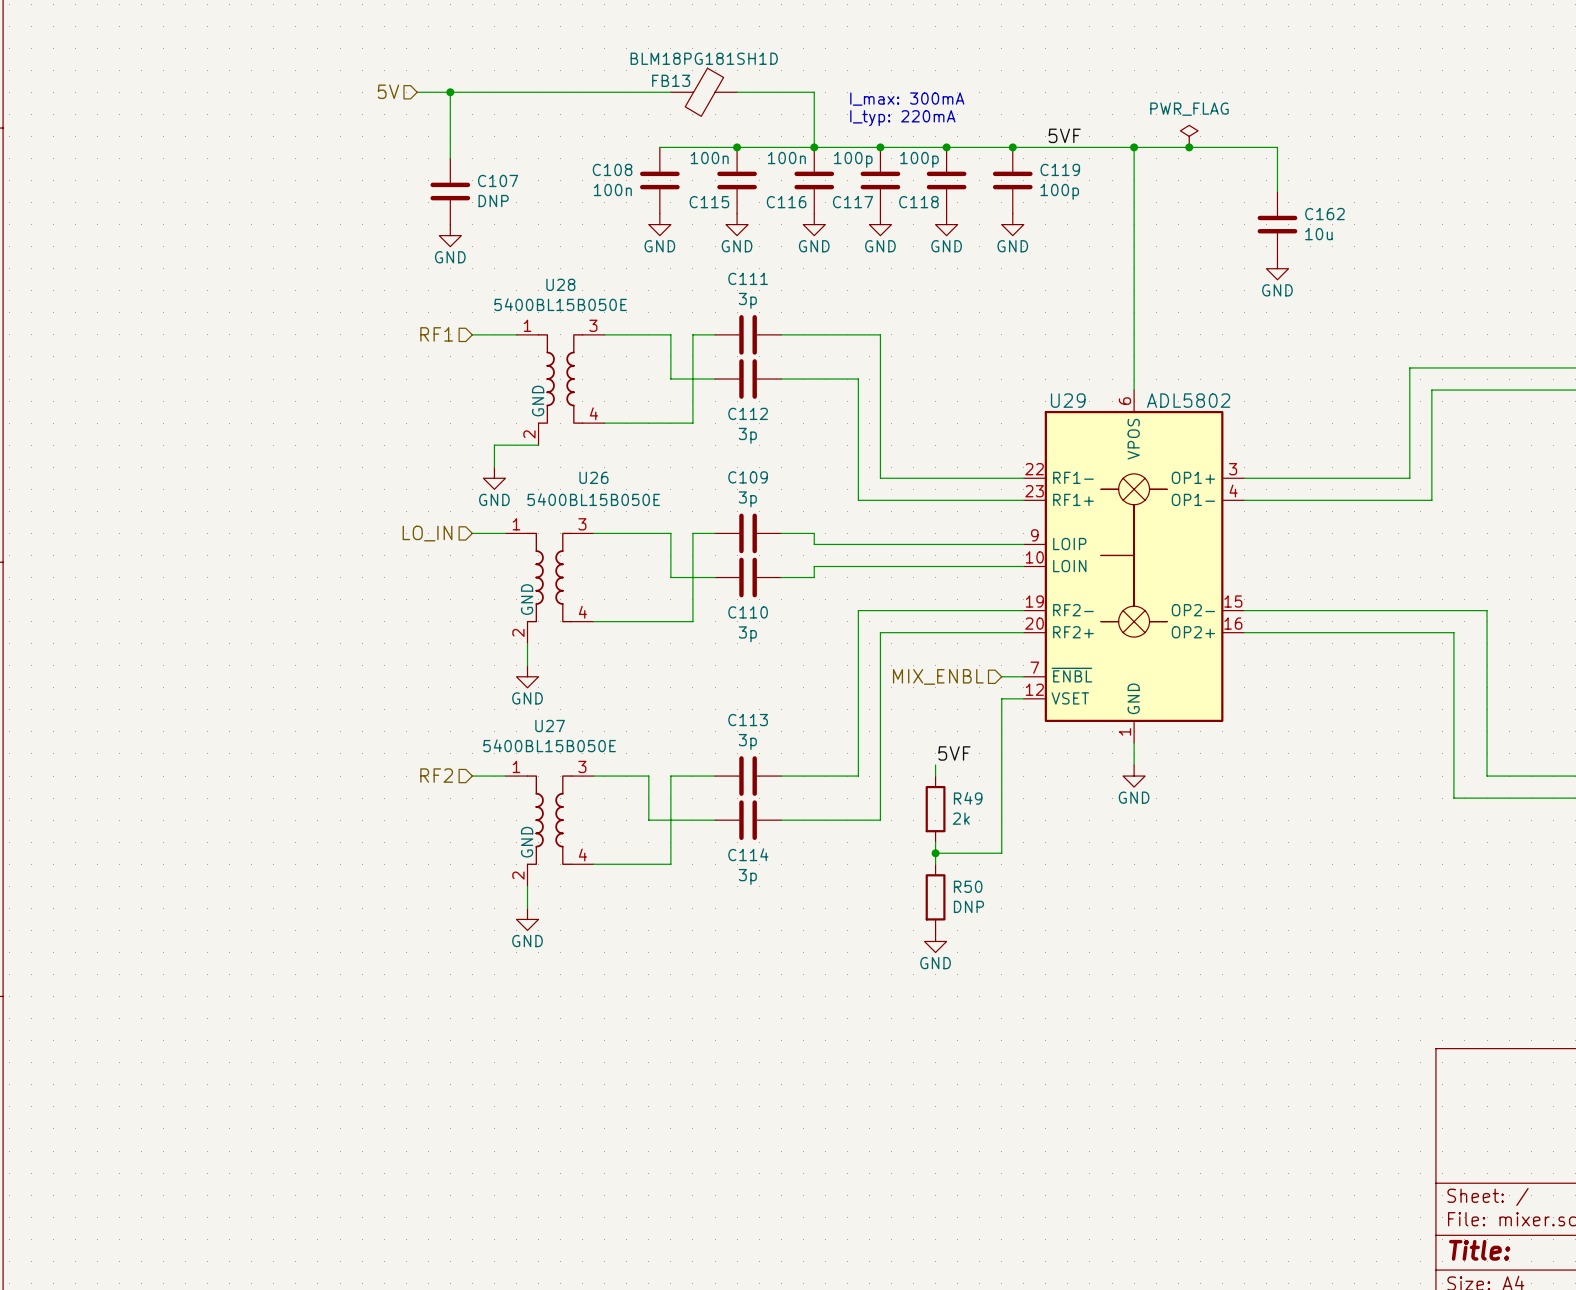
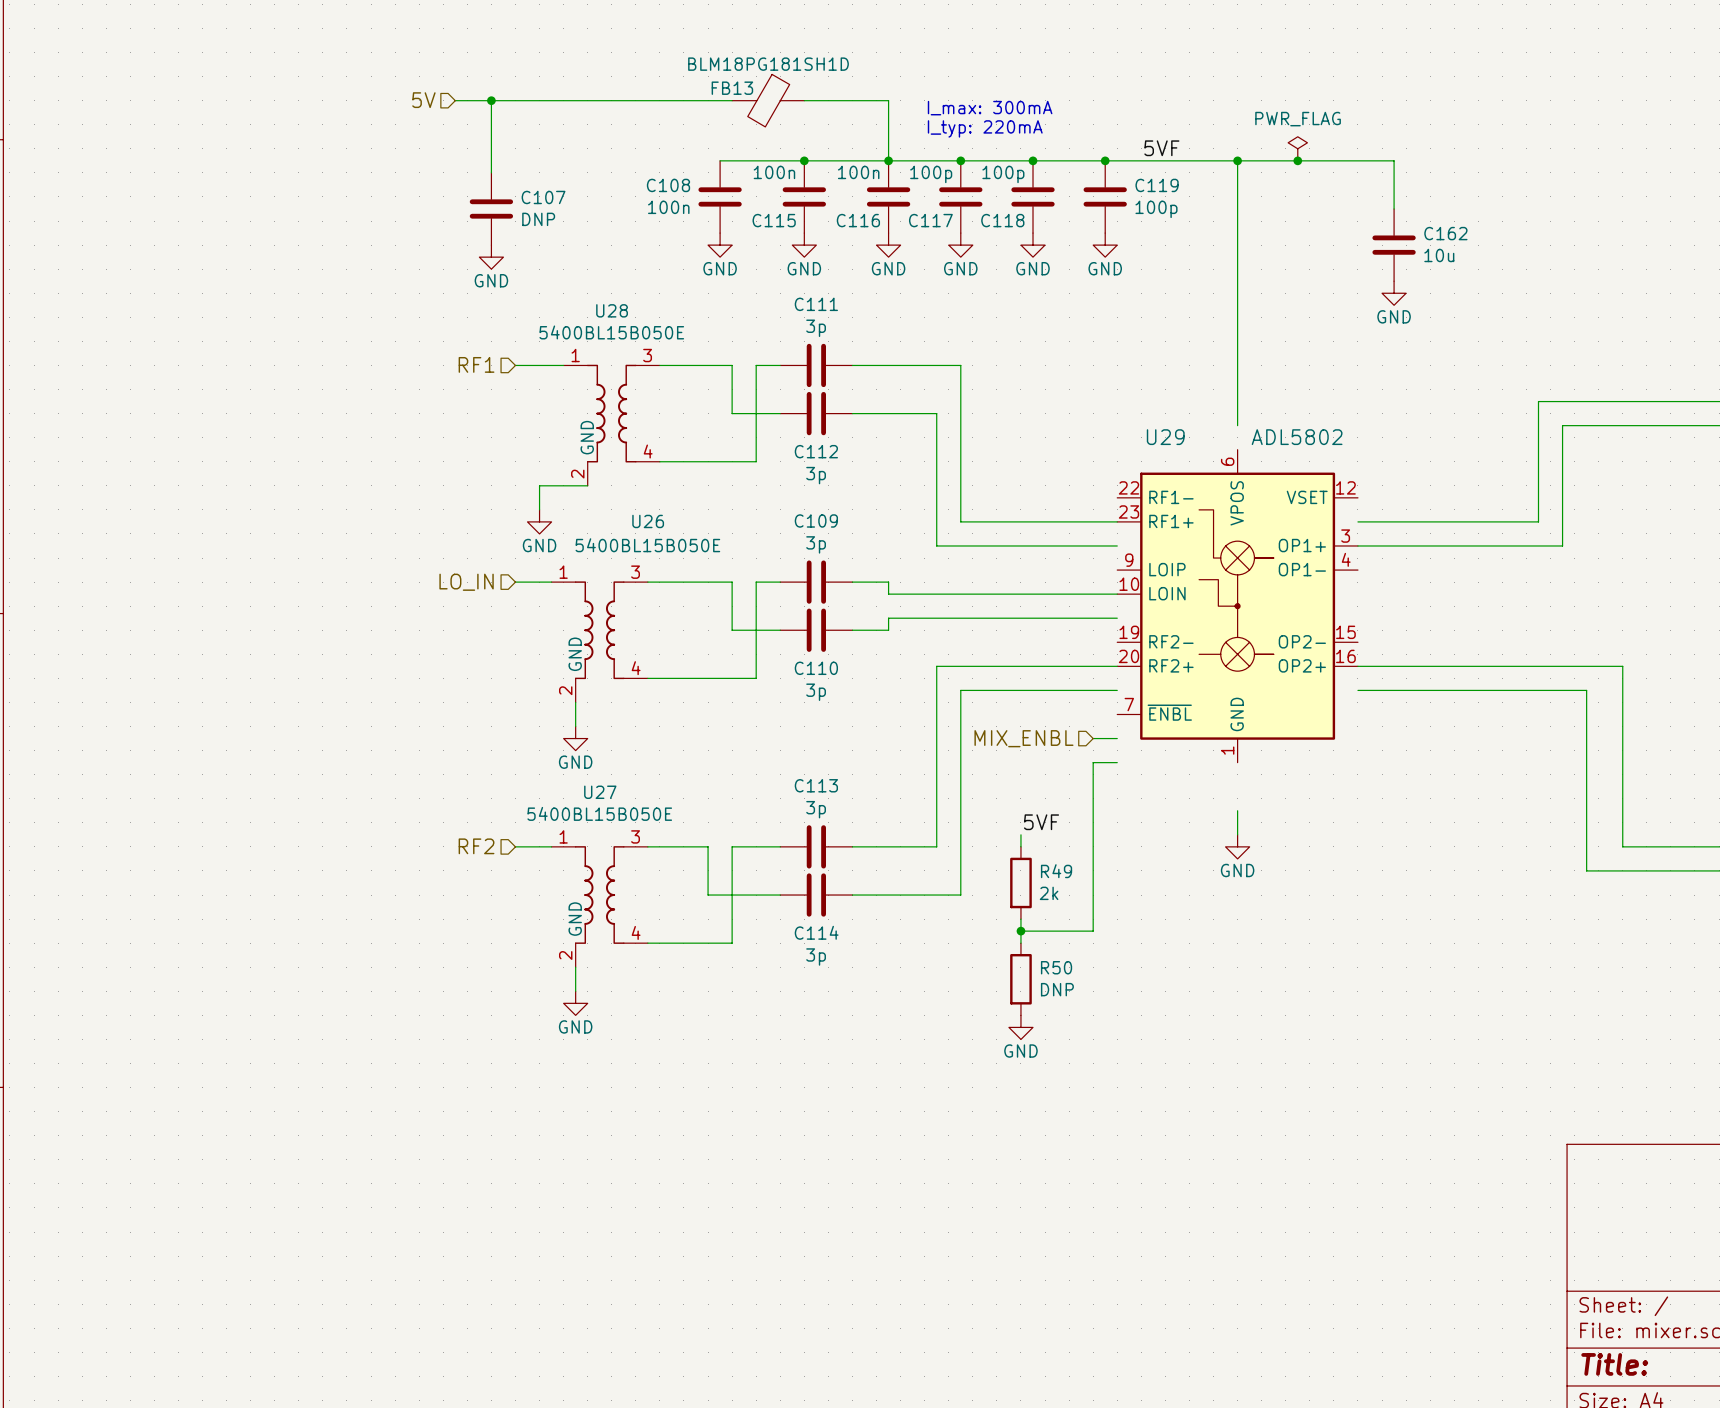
U29 symbol: [1023, 390, 1245, 743] -> [1117, 449, 1358, 763]

